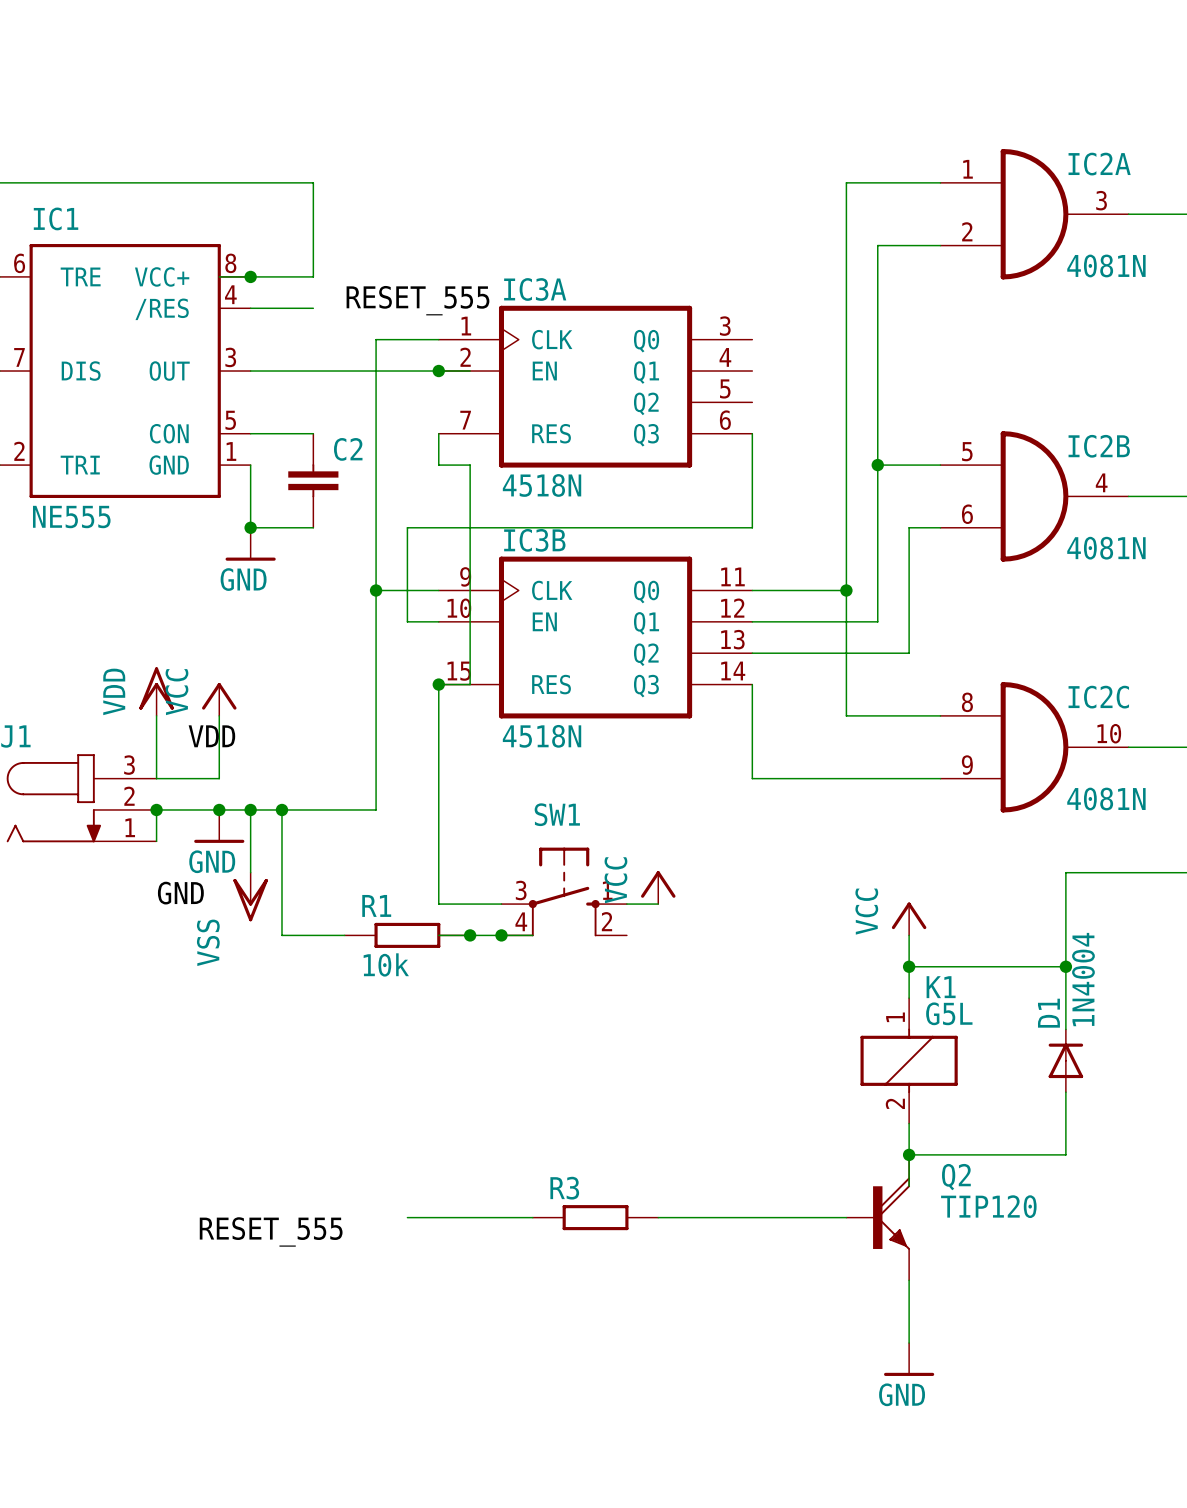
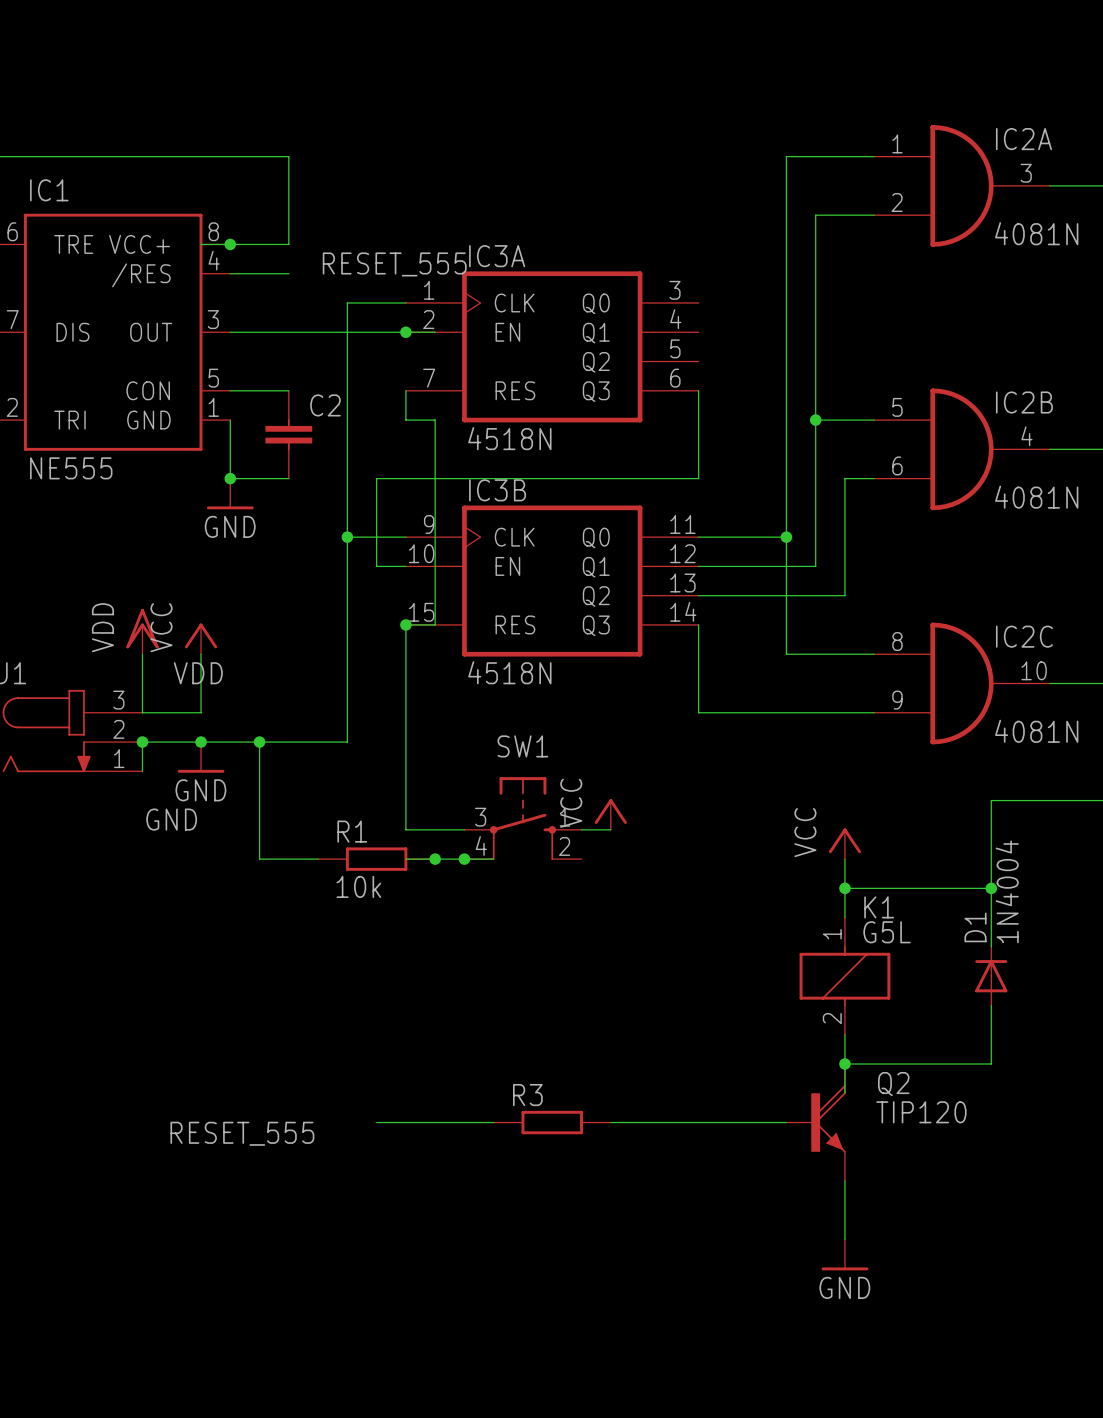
wire: (250, 809) (250, 872) -> none
junction: (250, 809) -> none
power symbol: VSS (250, 897) -> none

